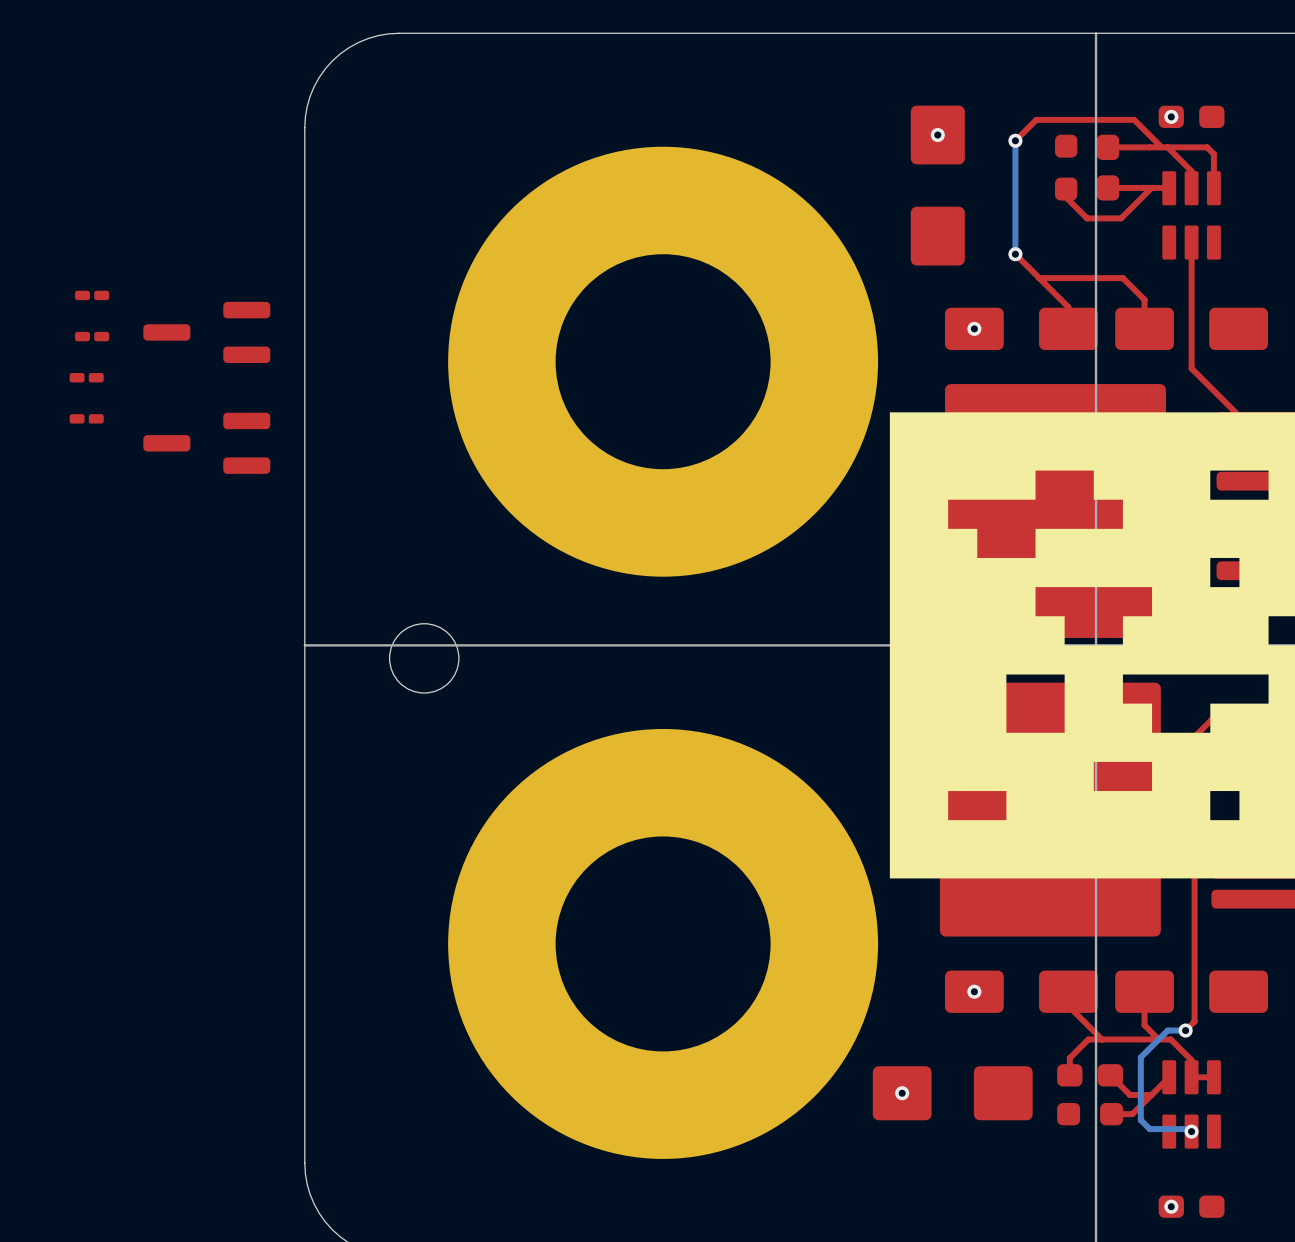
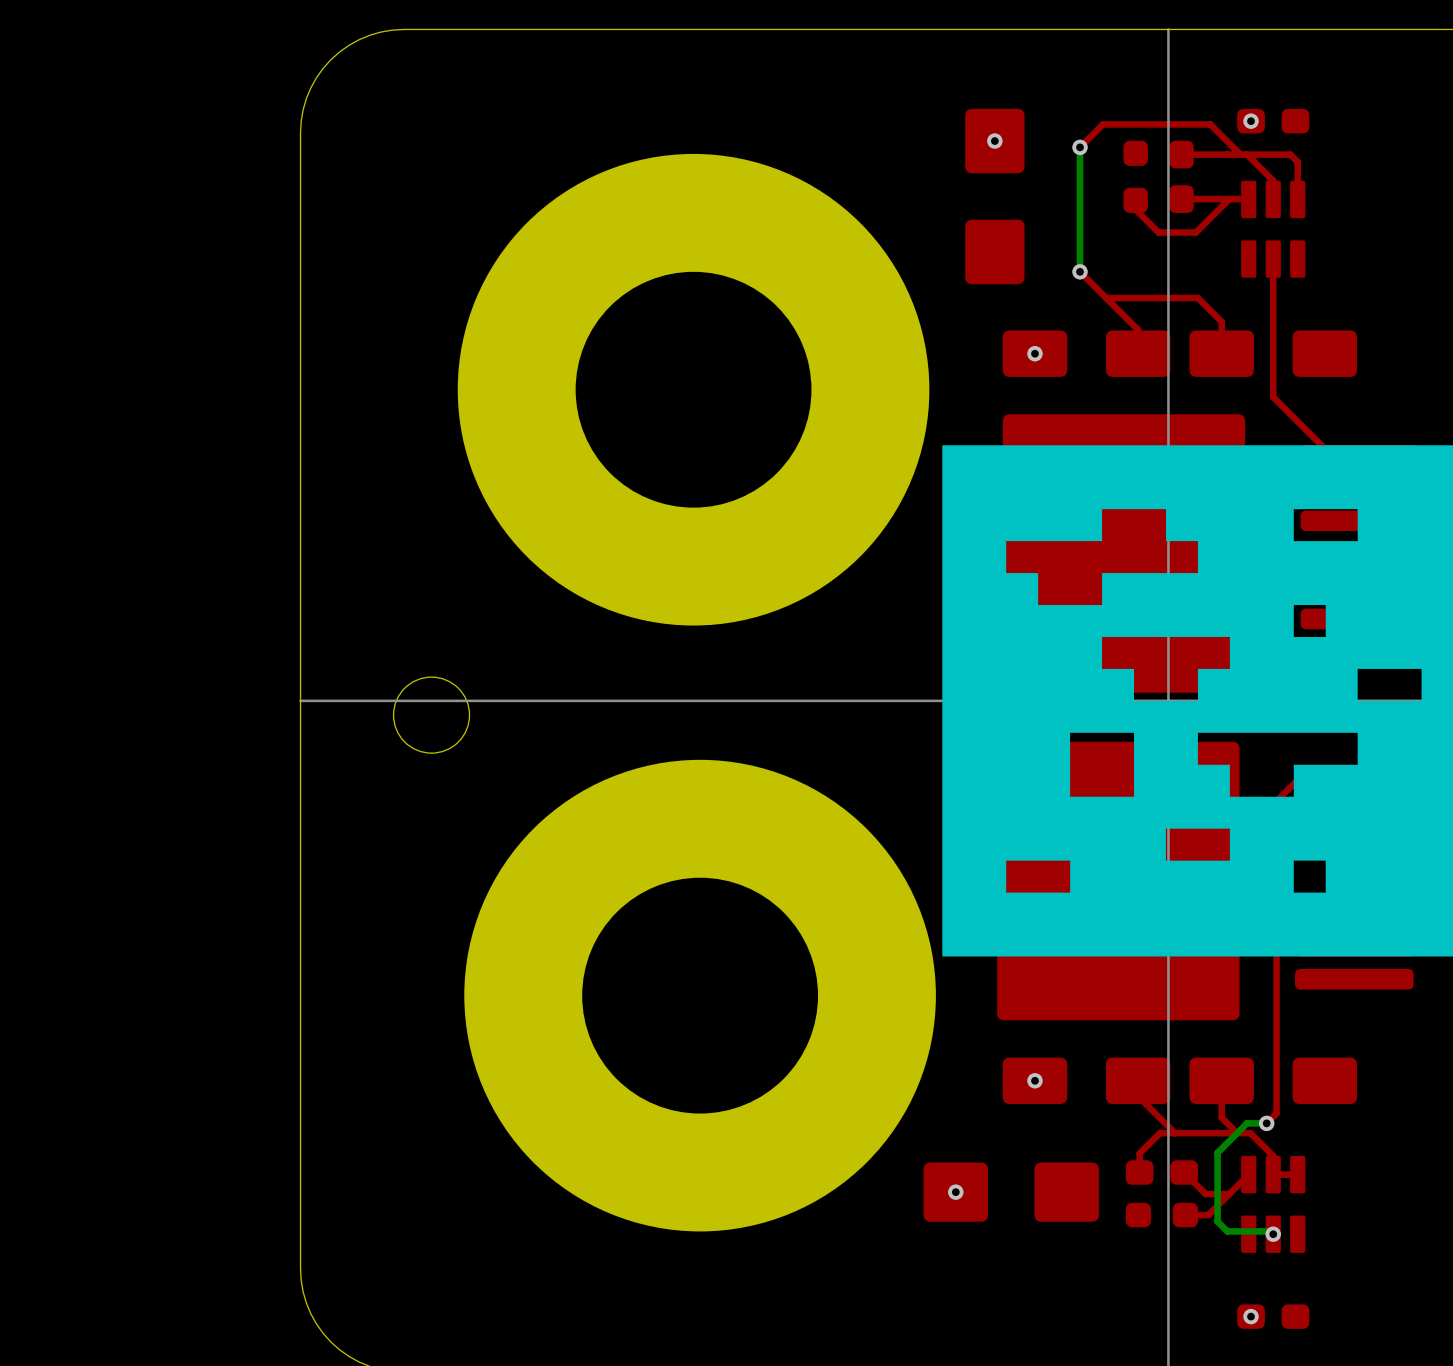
part: (92, 295) -> none
part: (206, 332) -> none
part: (92, 336) -> none
part: (86, 377) -> none
part: (86, 418) -> none
part: (206, 443) -> none
part position: (663, 943) -> (700, 995)

